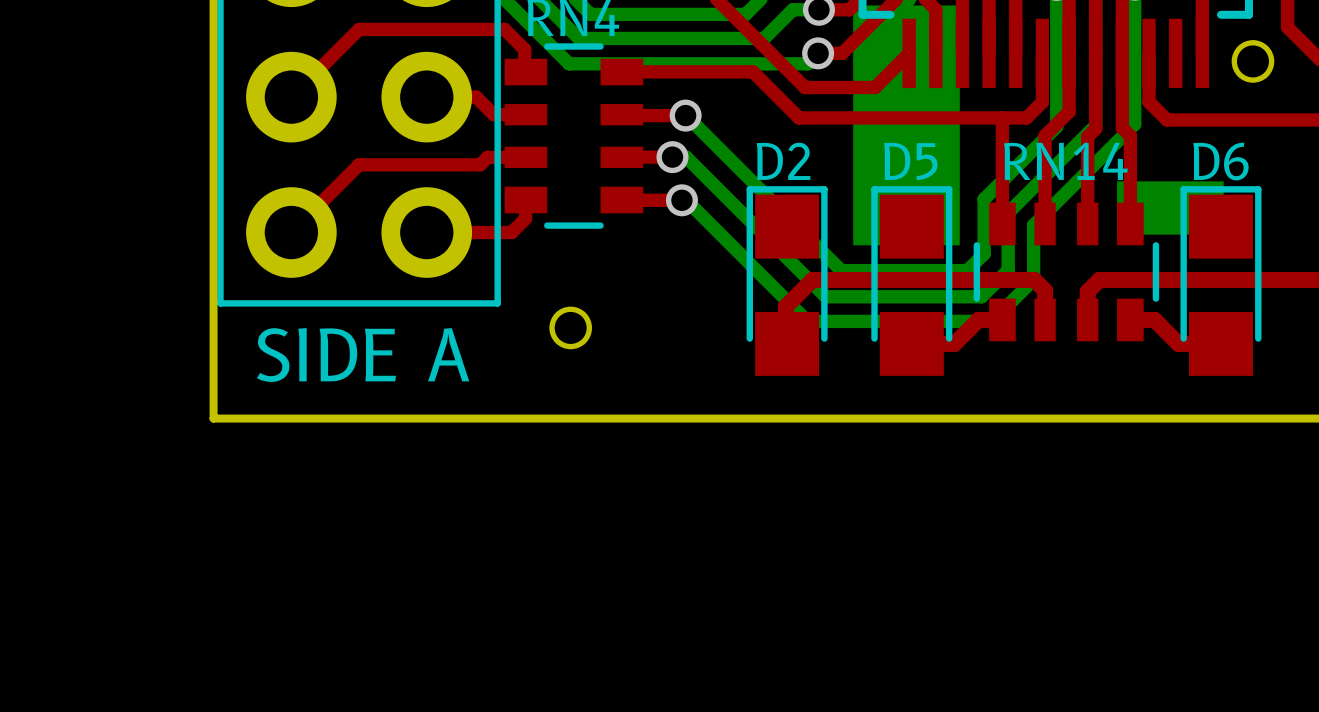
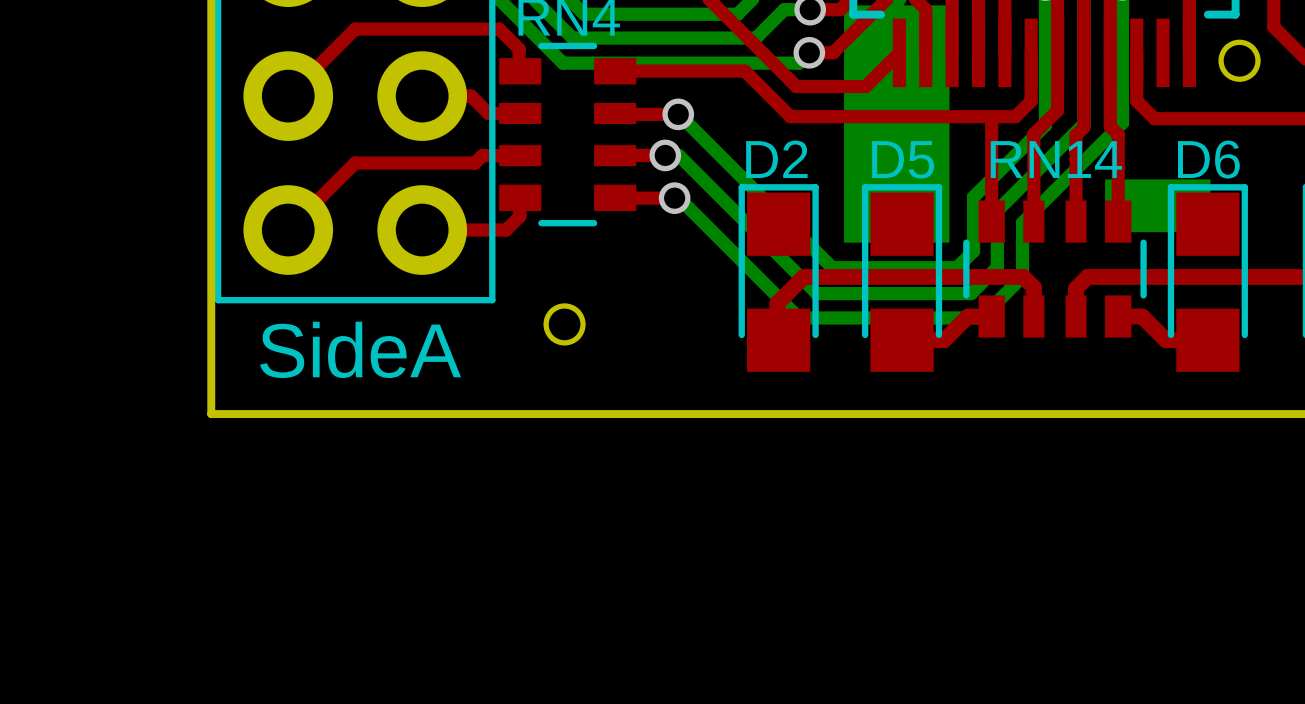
part value: SIDE A (363, 355) -> SideA (360, 349)

